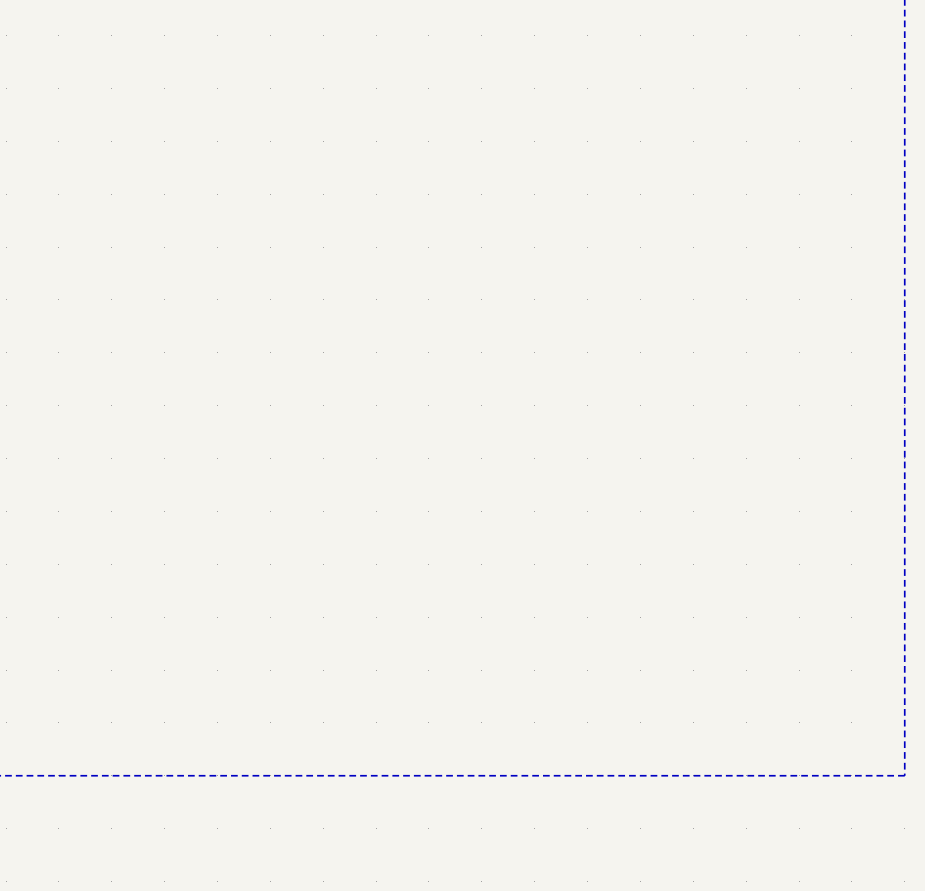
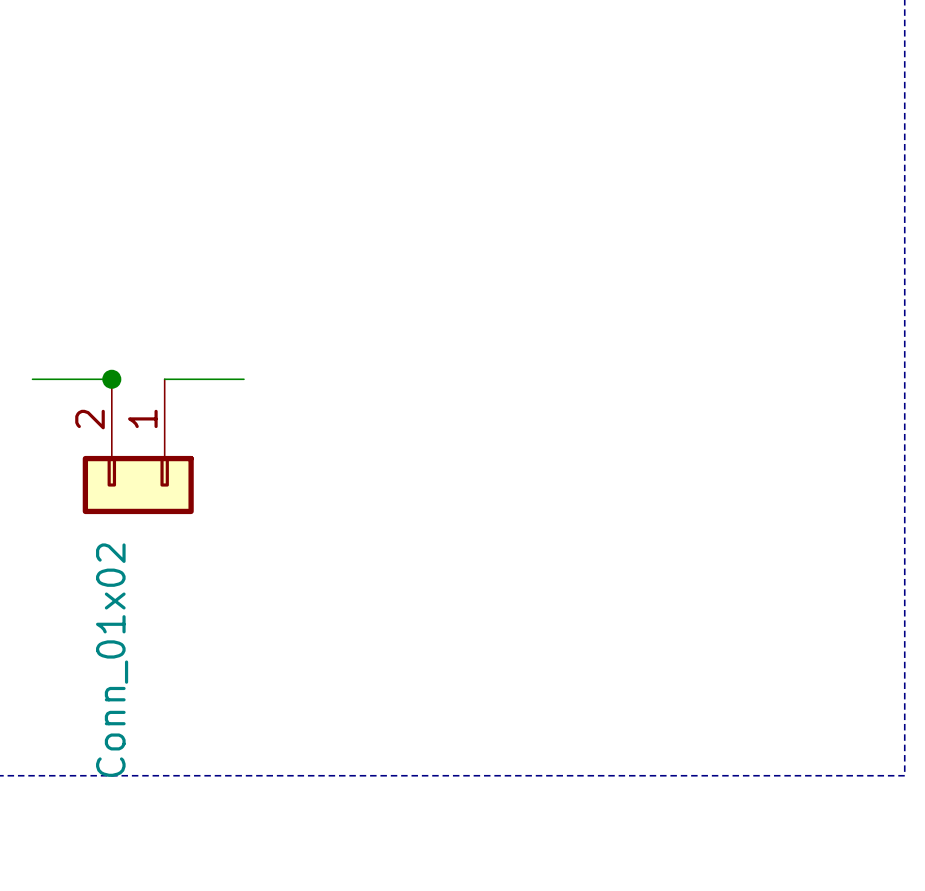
wire: none -> (32, 379) (111, 379)
junction: none -> (111, 379)
wire: none -> (164, 379) (243, 379)
part: none -> Conn_01x02 (138, 446)

